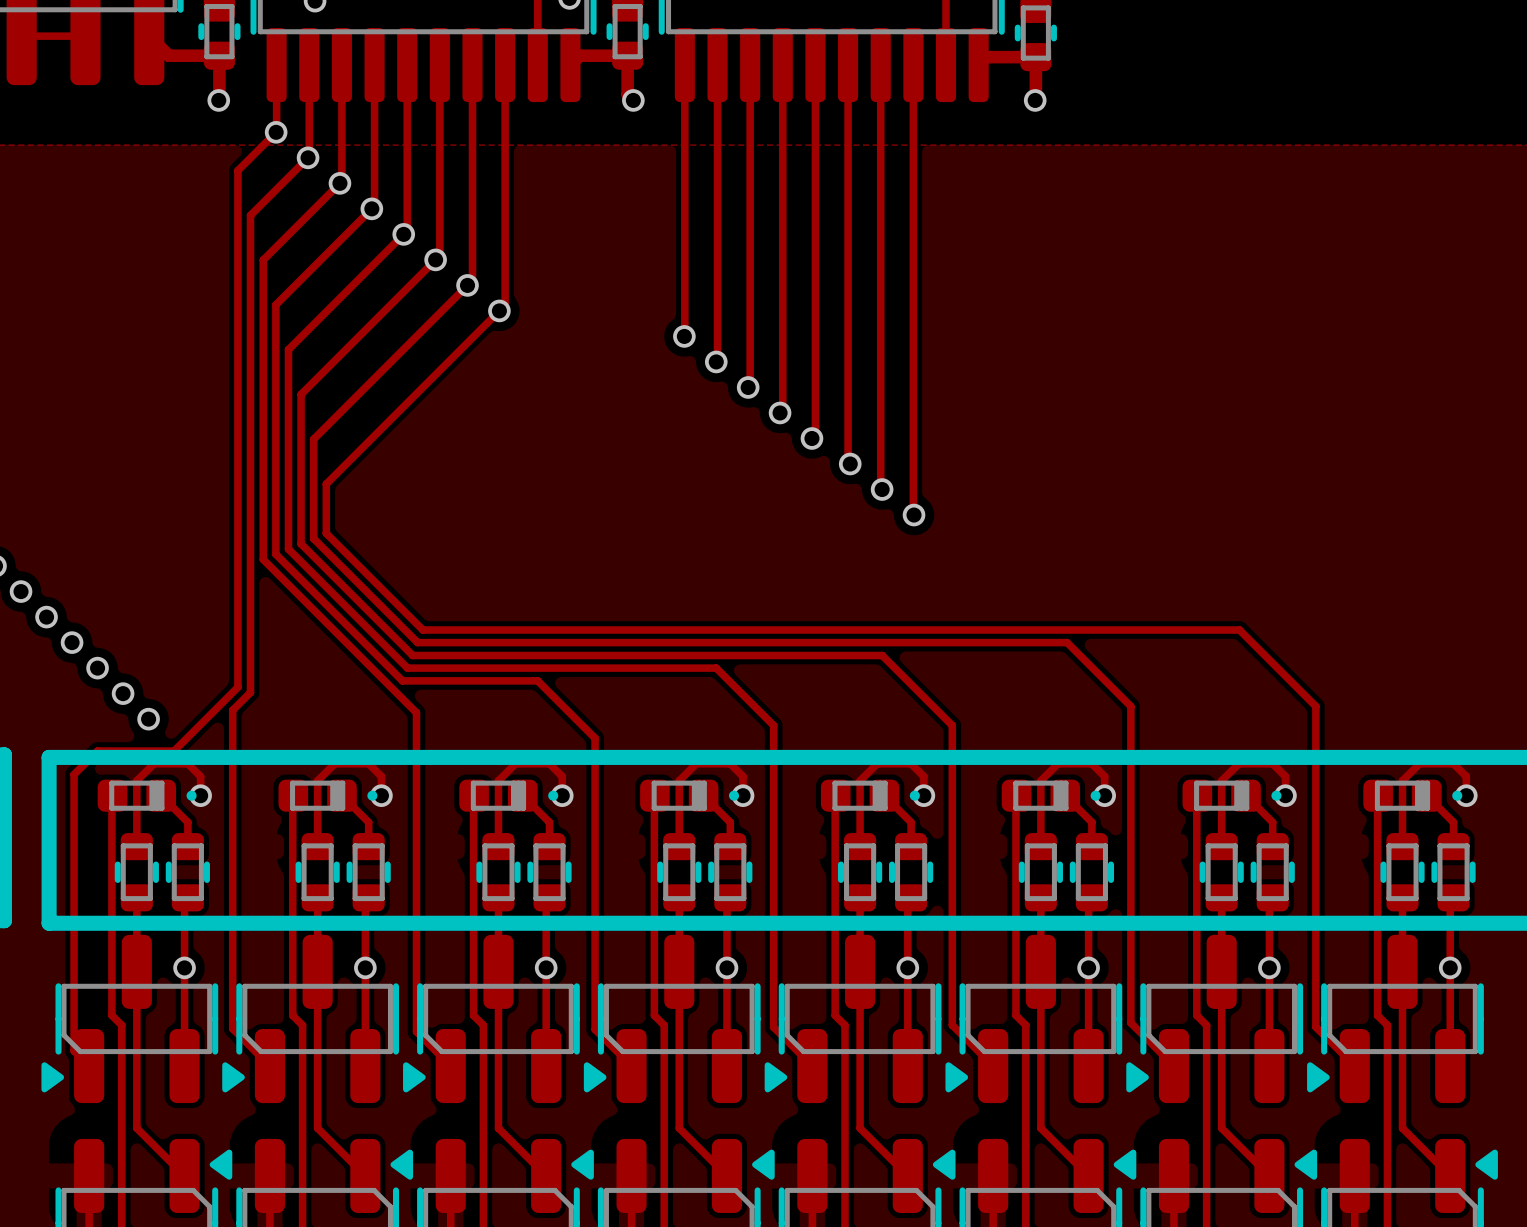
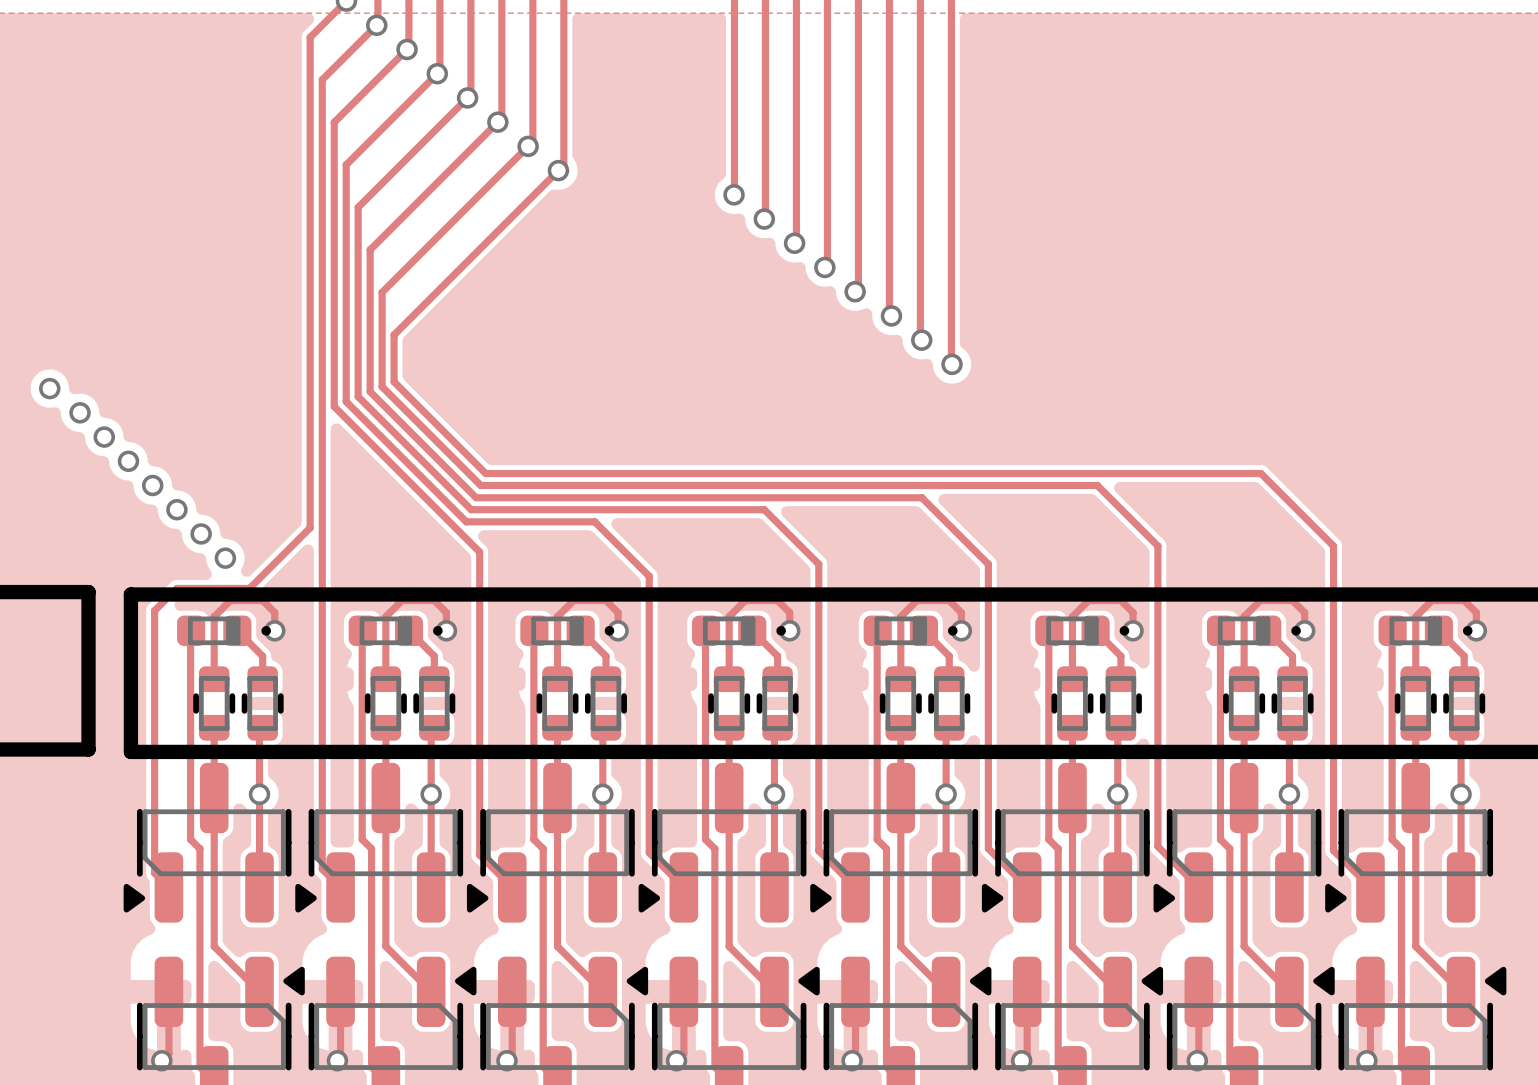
track: (250, 215) (250, 692) (232, 710) (232, 1028) (250, 1046) -> (322, 79) (322, 869)

